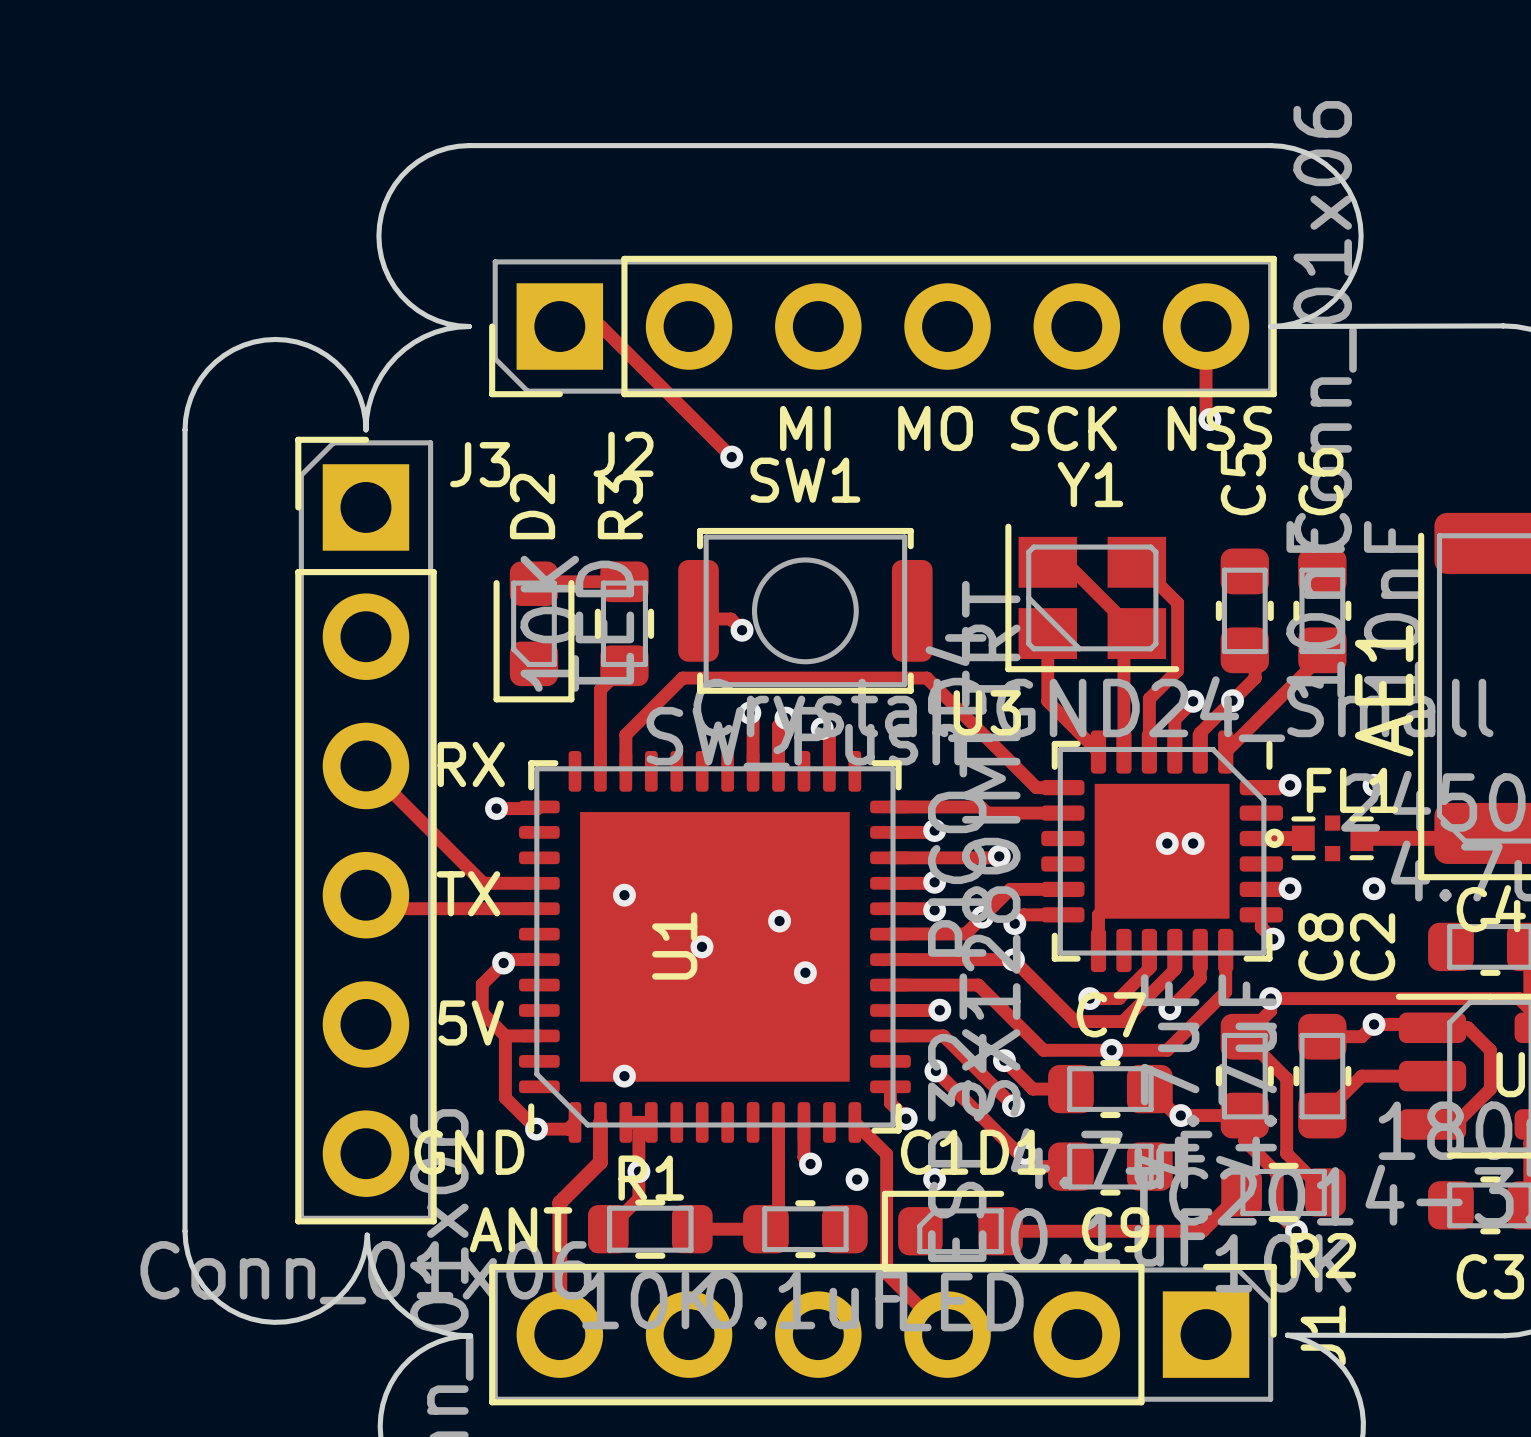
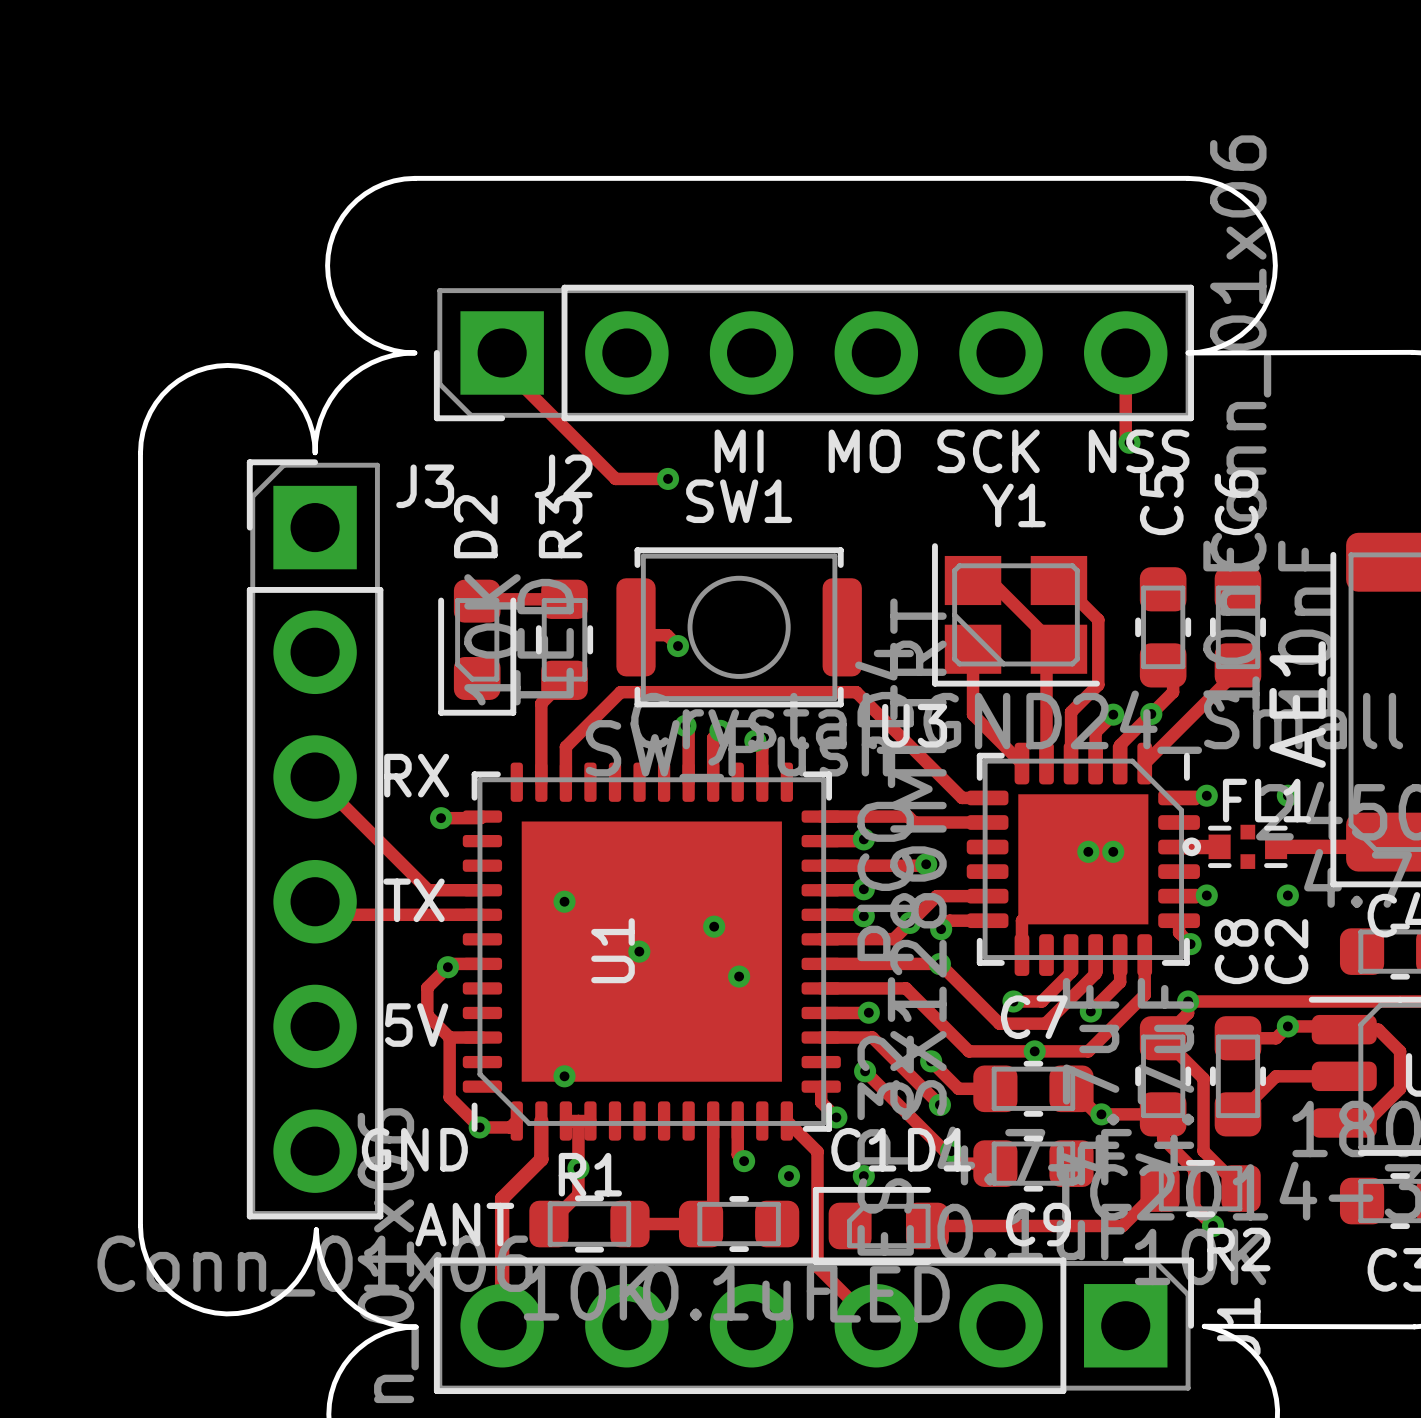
track: (559, 326) (601, 326) (731, 457) -> (502, 352) (502, 365) (615, 478) (668, 478)

